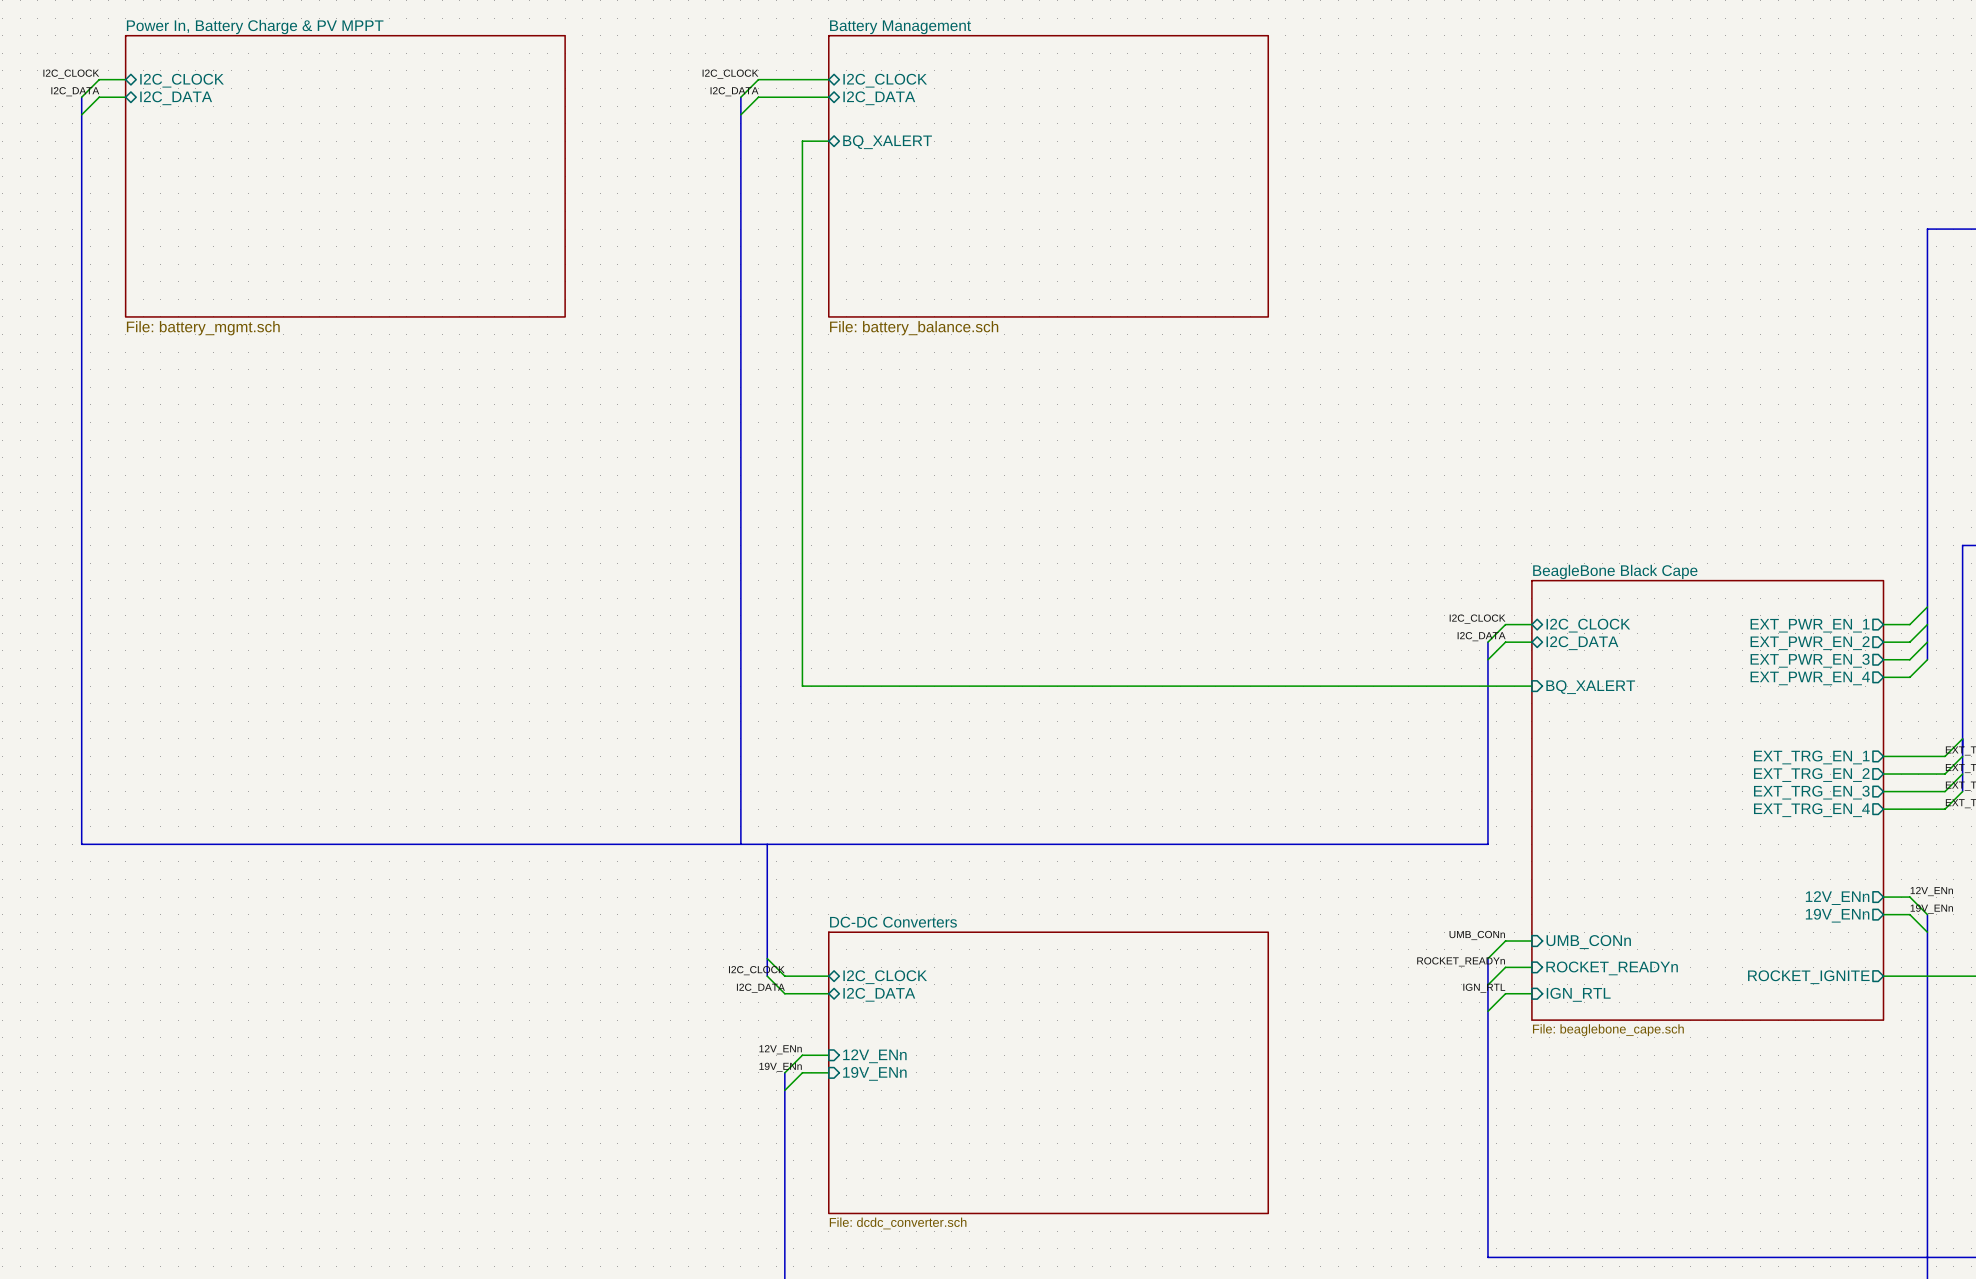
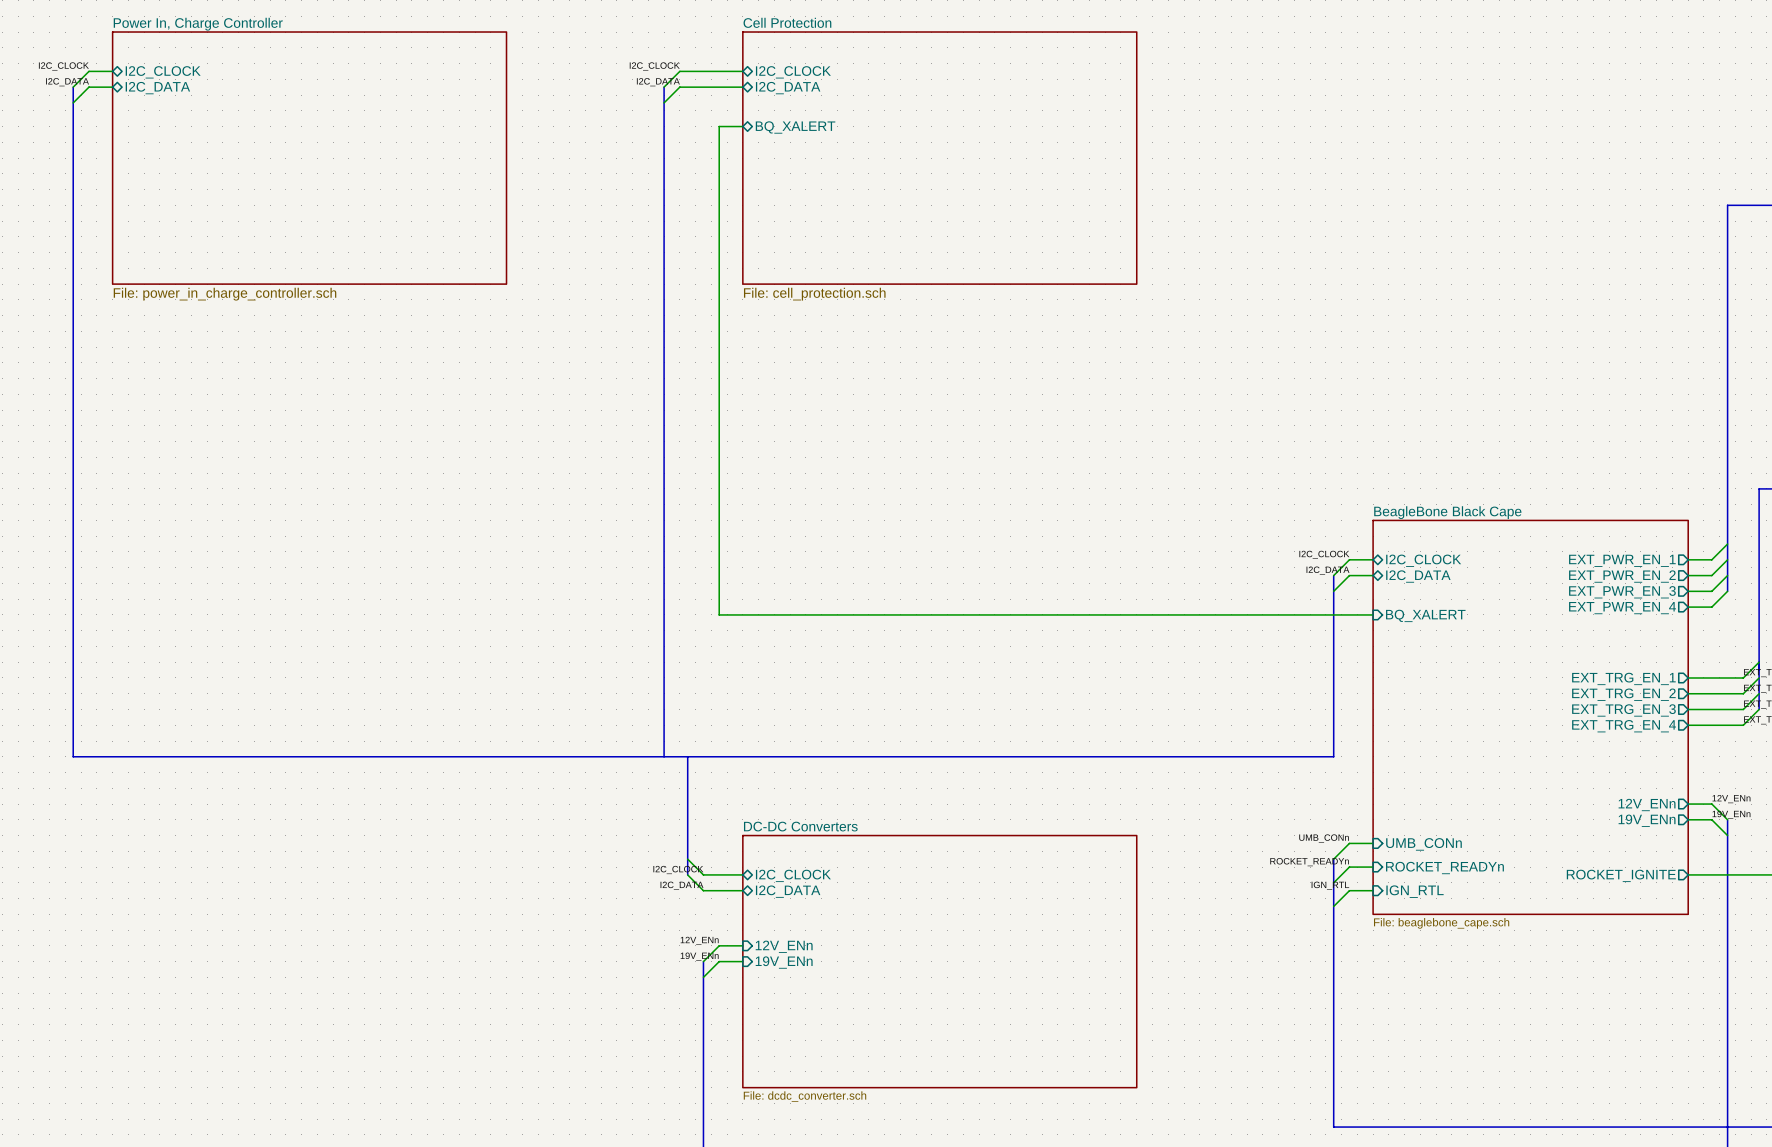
sheet Power In, Battery Charge & PV MPPT name: Power In, Battery Charge & PV MPPT (255, 26) -> Power In, Charge Controller (198, 24)
sheet Battery Management name: Battery Management (900, 27) -> Cell Protection (787, 22)
sheet Power In, Battery Charge & PV MPPT value: File: battery_mgmt.sch (203, 328) -> File: power_in_charge_controller.sch (225, 294)
sheet Battery Management value: File: battery_balance.sch (914, 328) -> File: cell_protection.sch (814, 294)

